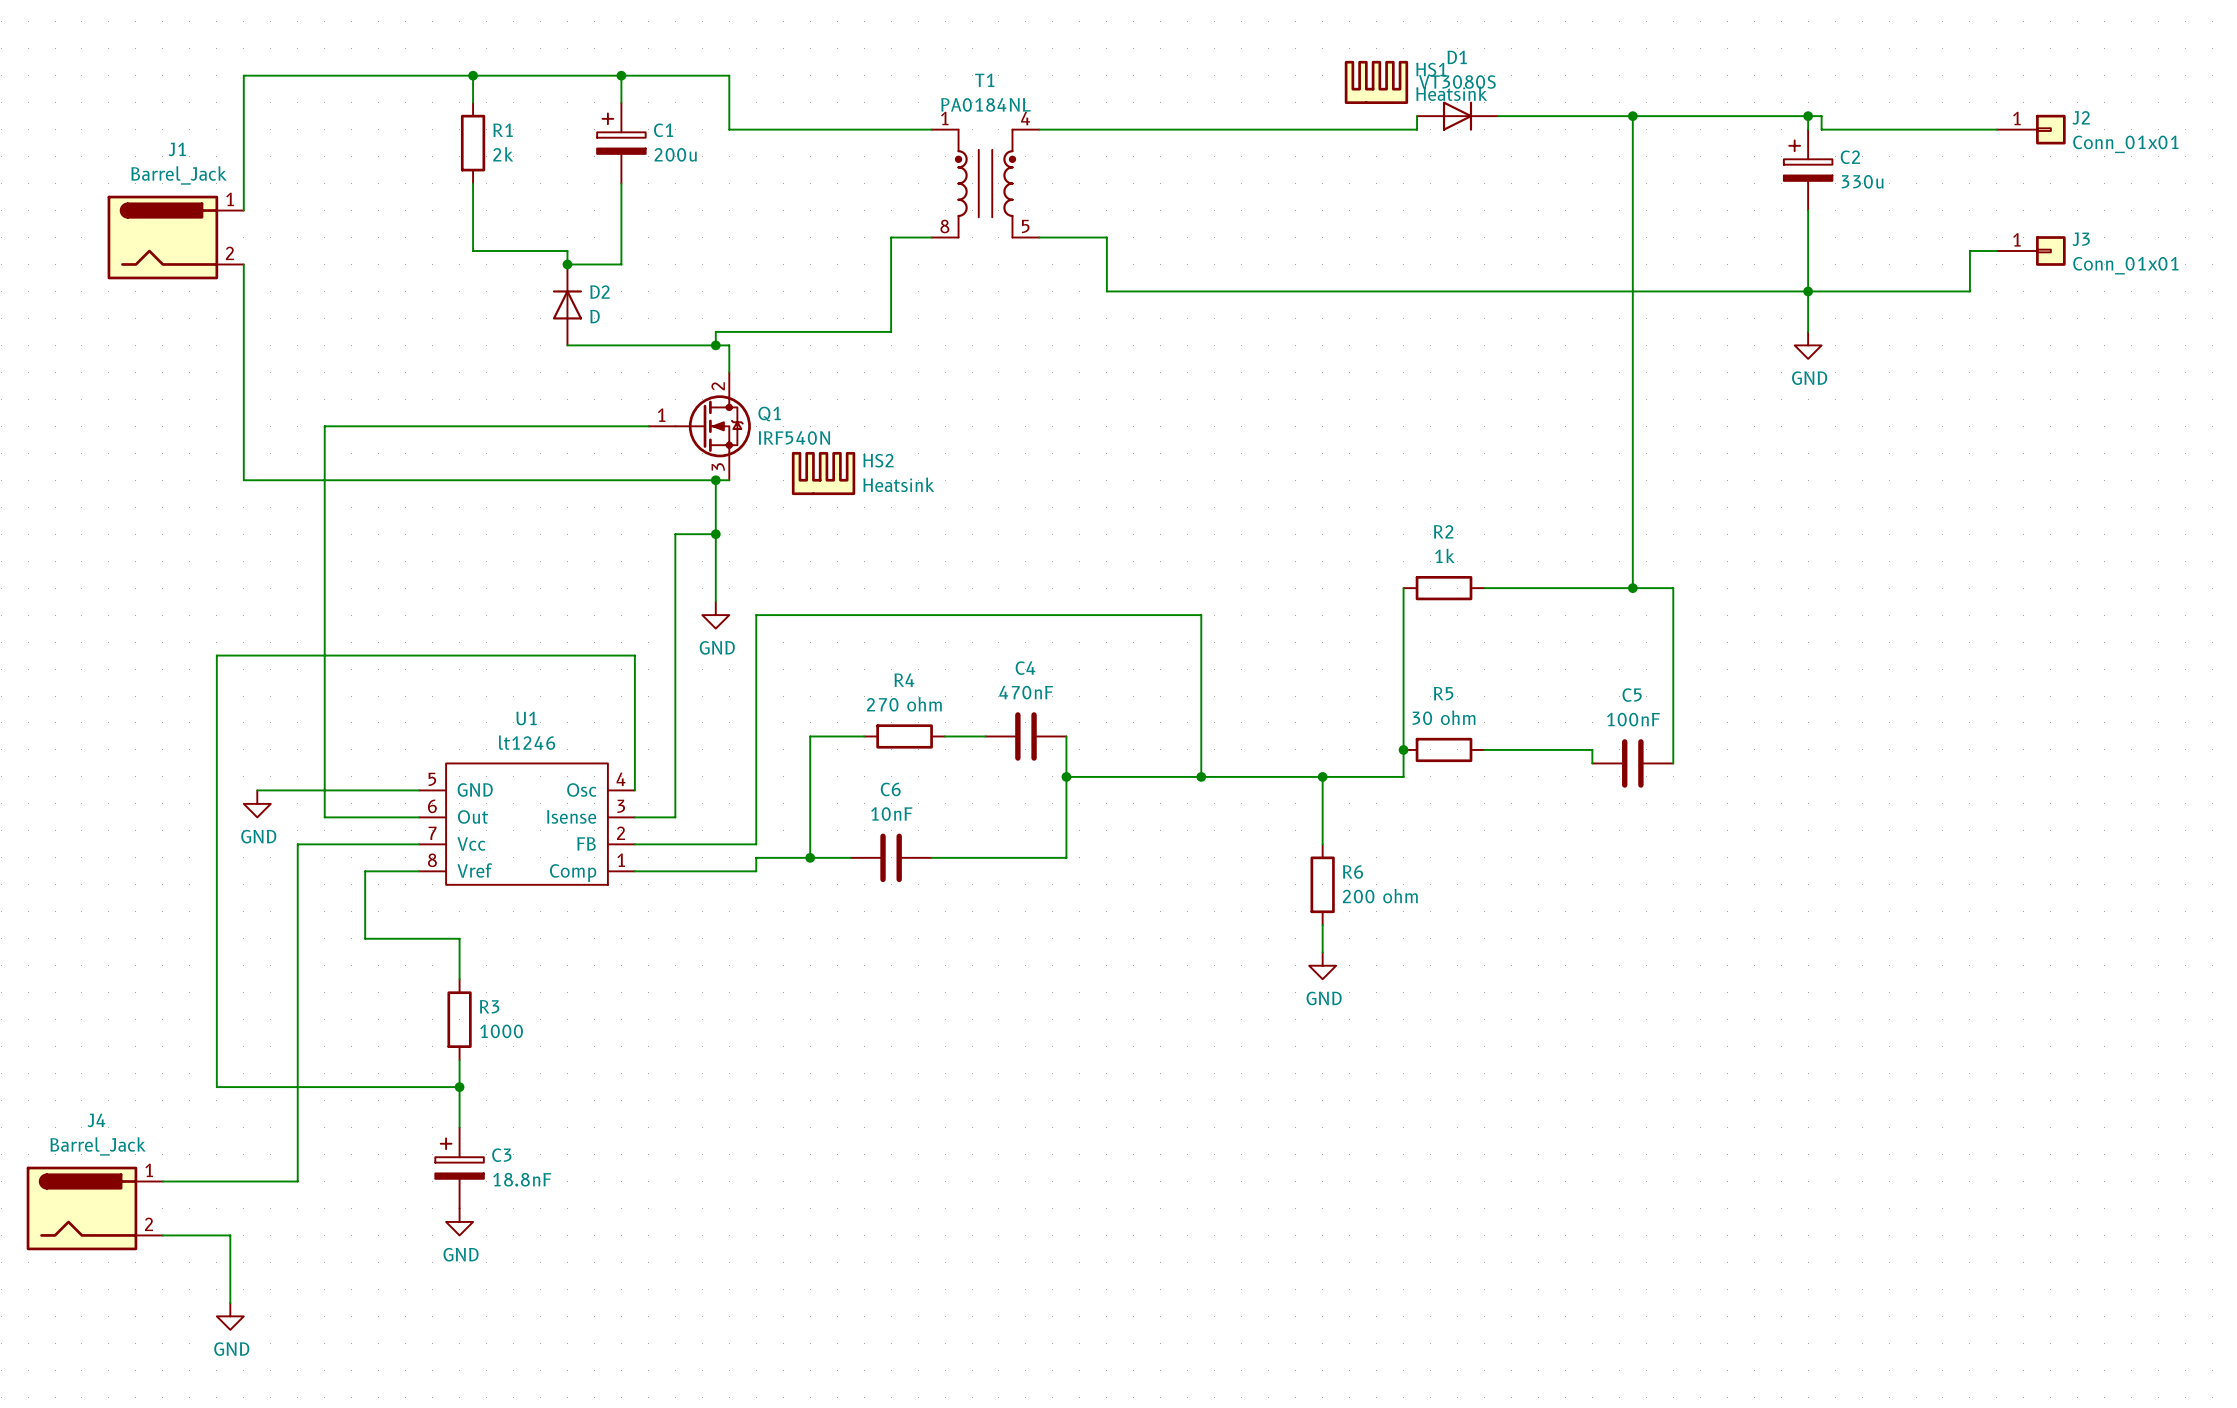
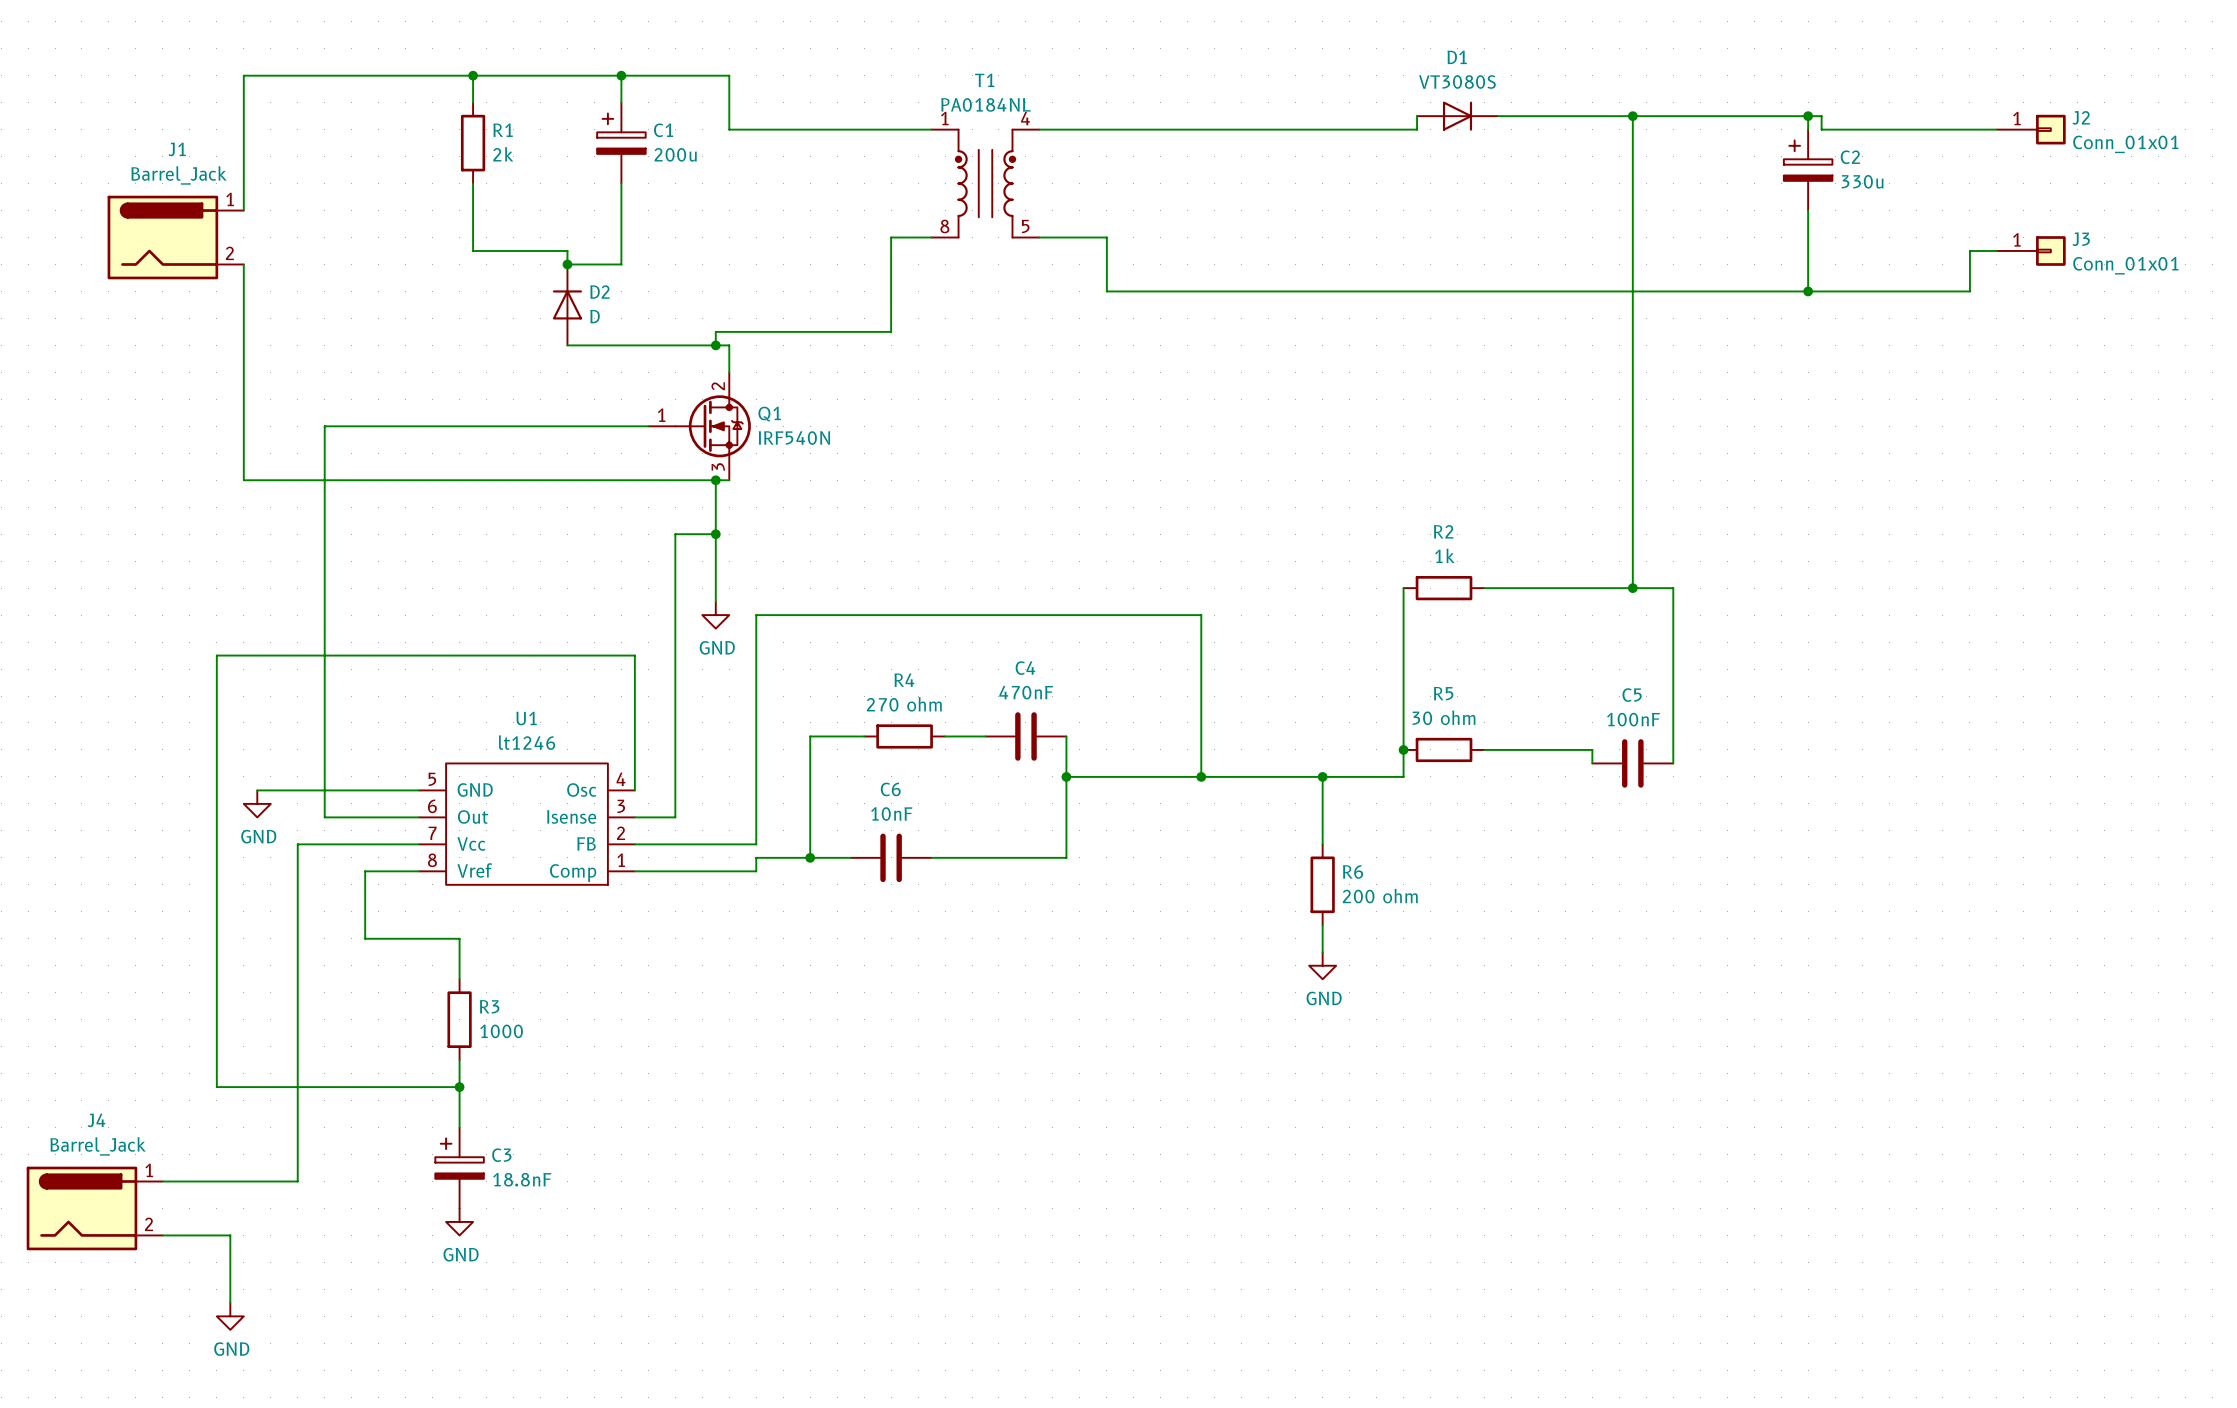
HS1: Heatsink (1376, 82) -> none
wire: (1808, 291) (1808, 331) -> none
power symbol: GND (1808, 345) -> none
HS2: Heatsink (823, 473) -> none

